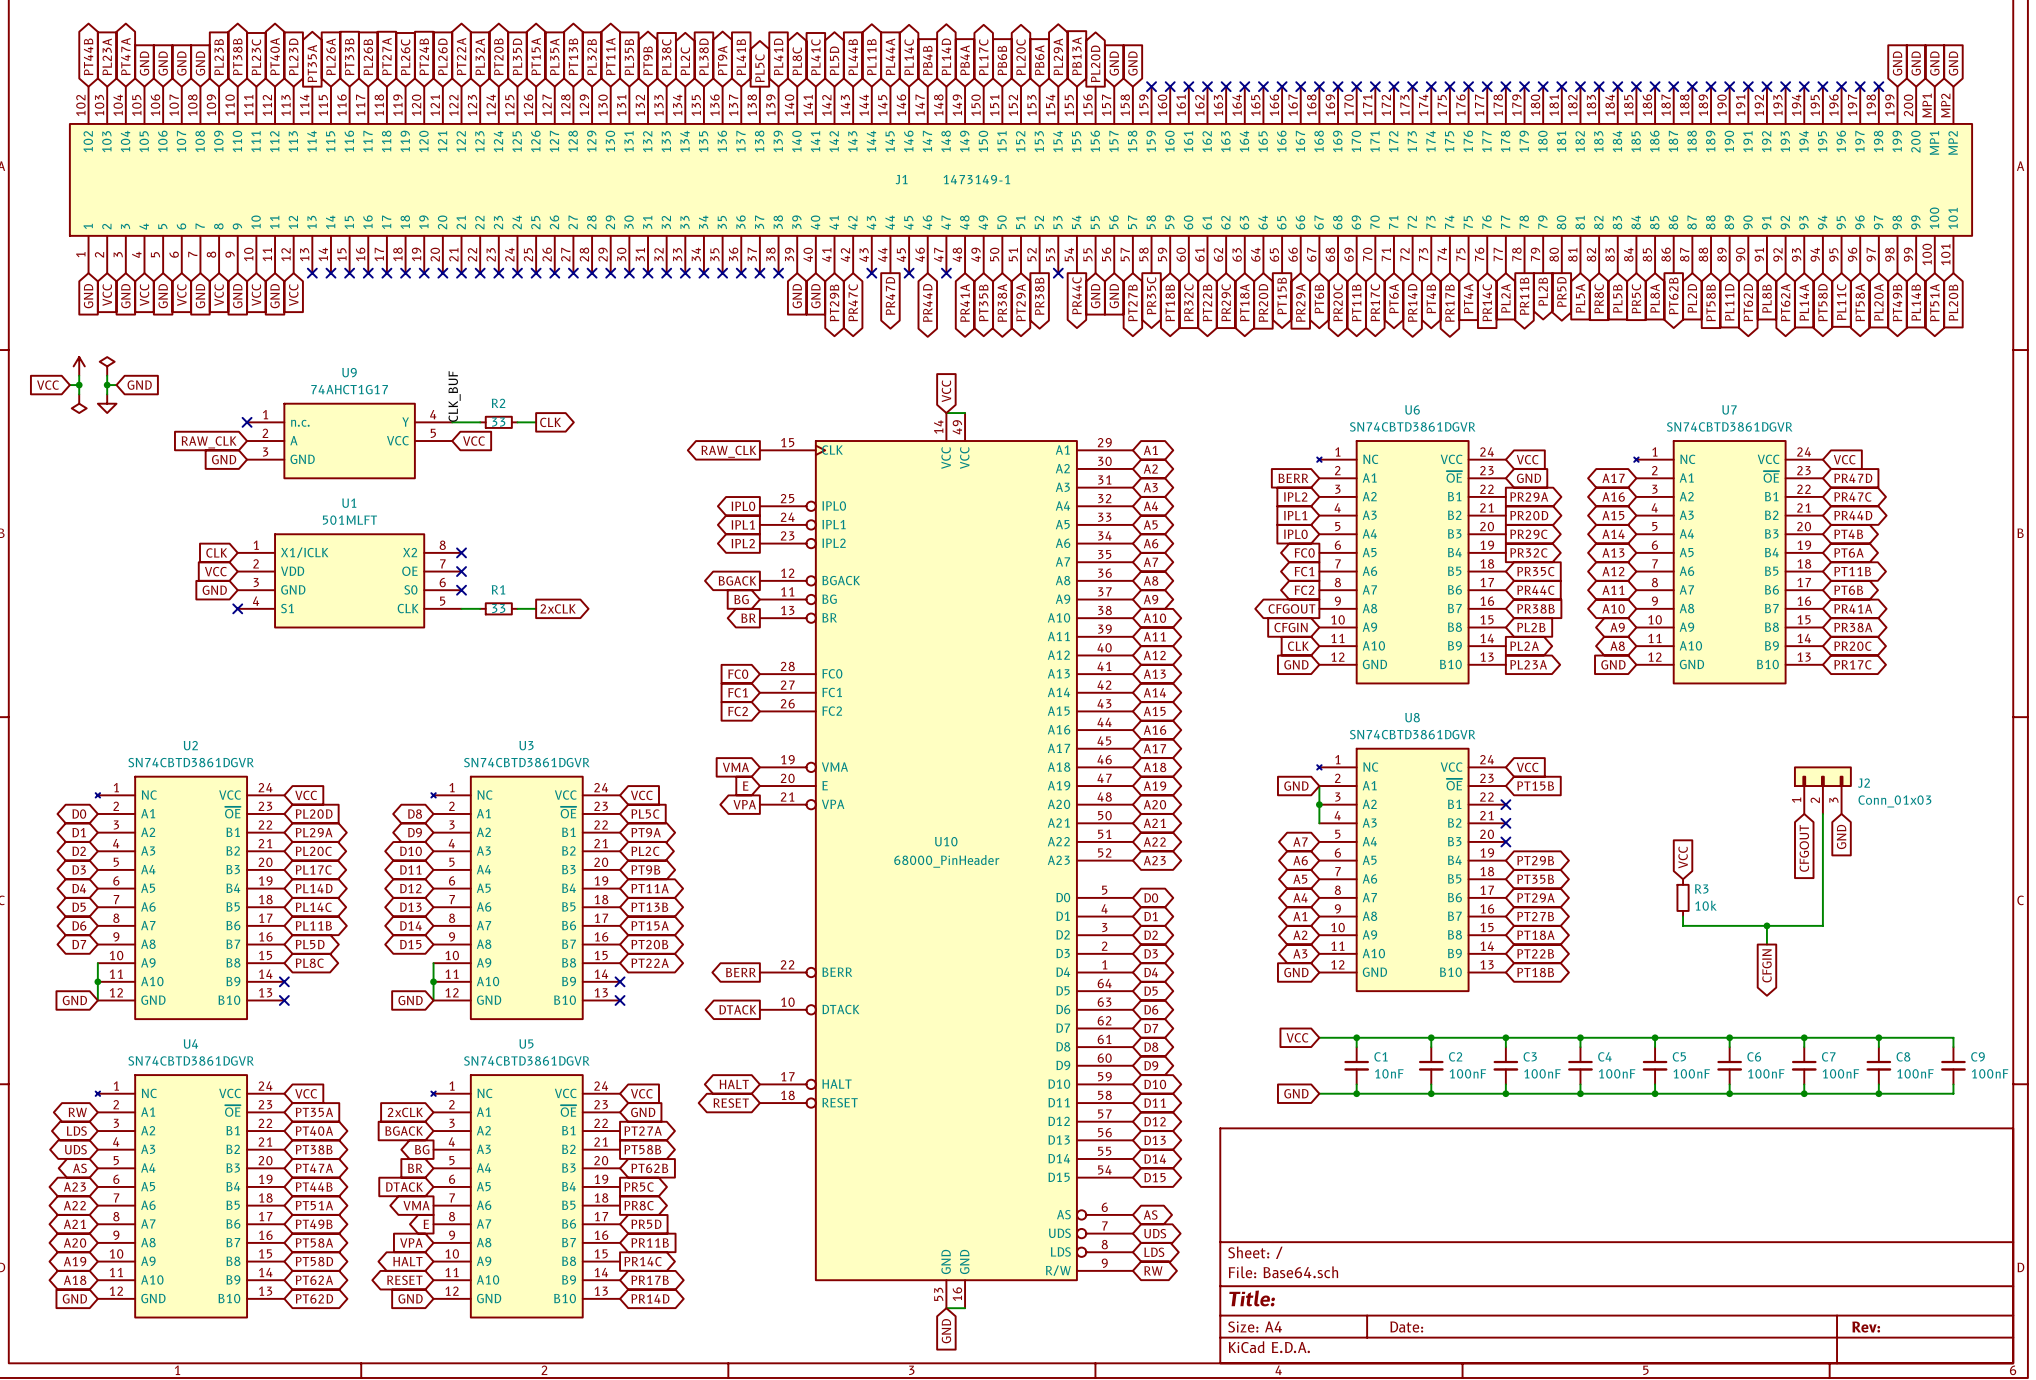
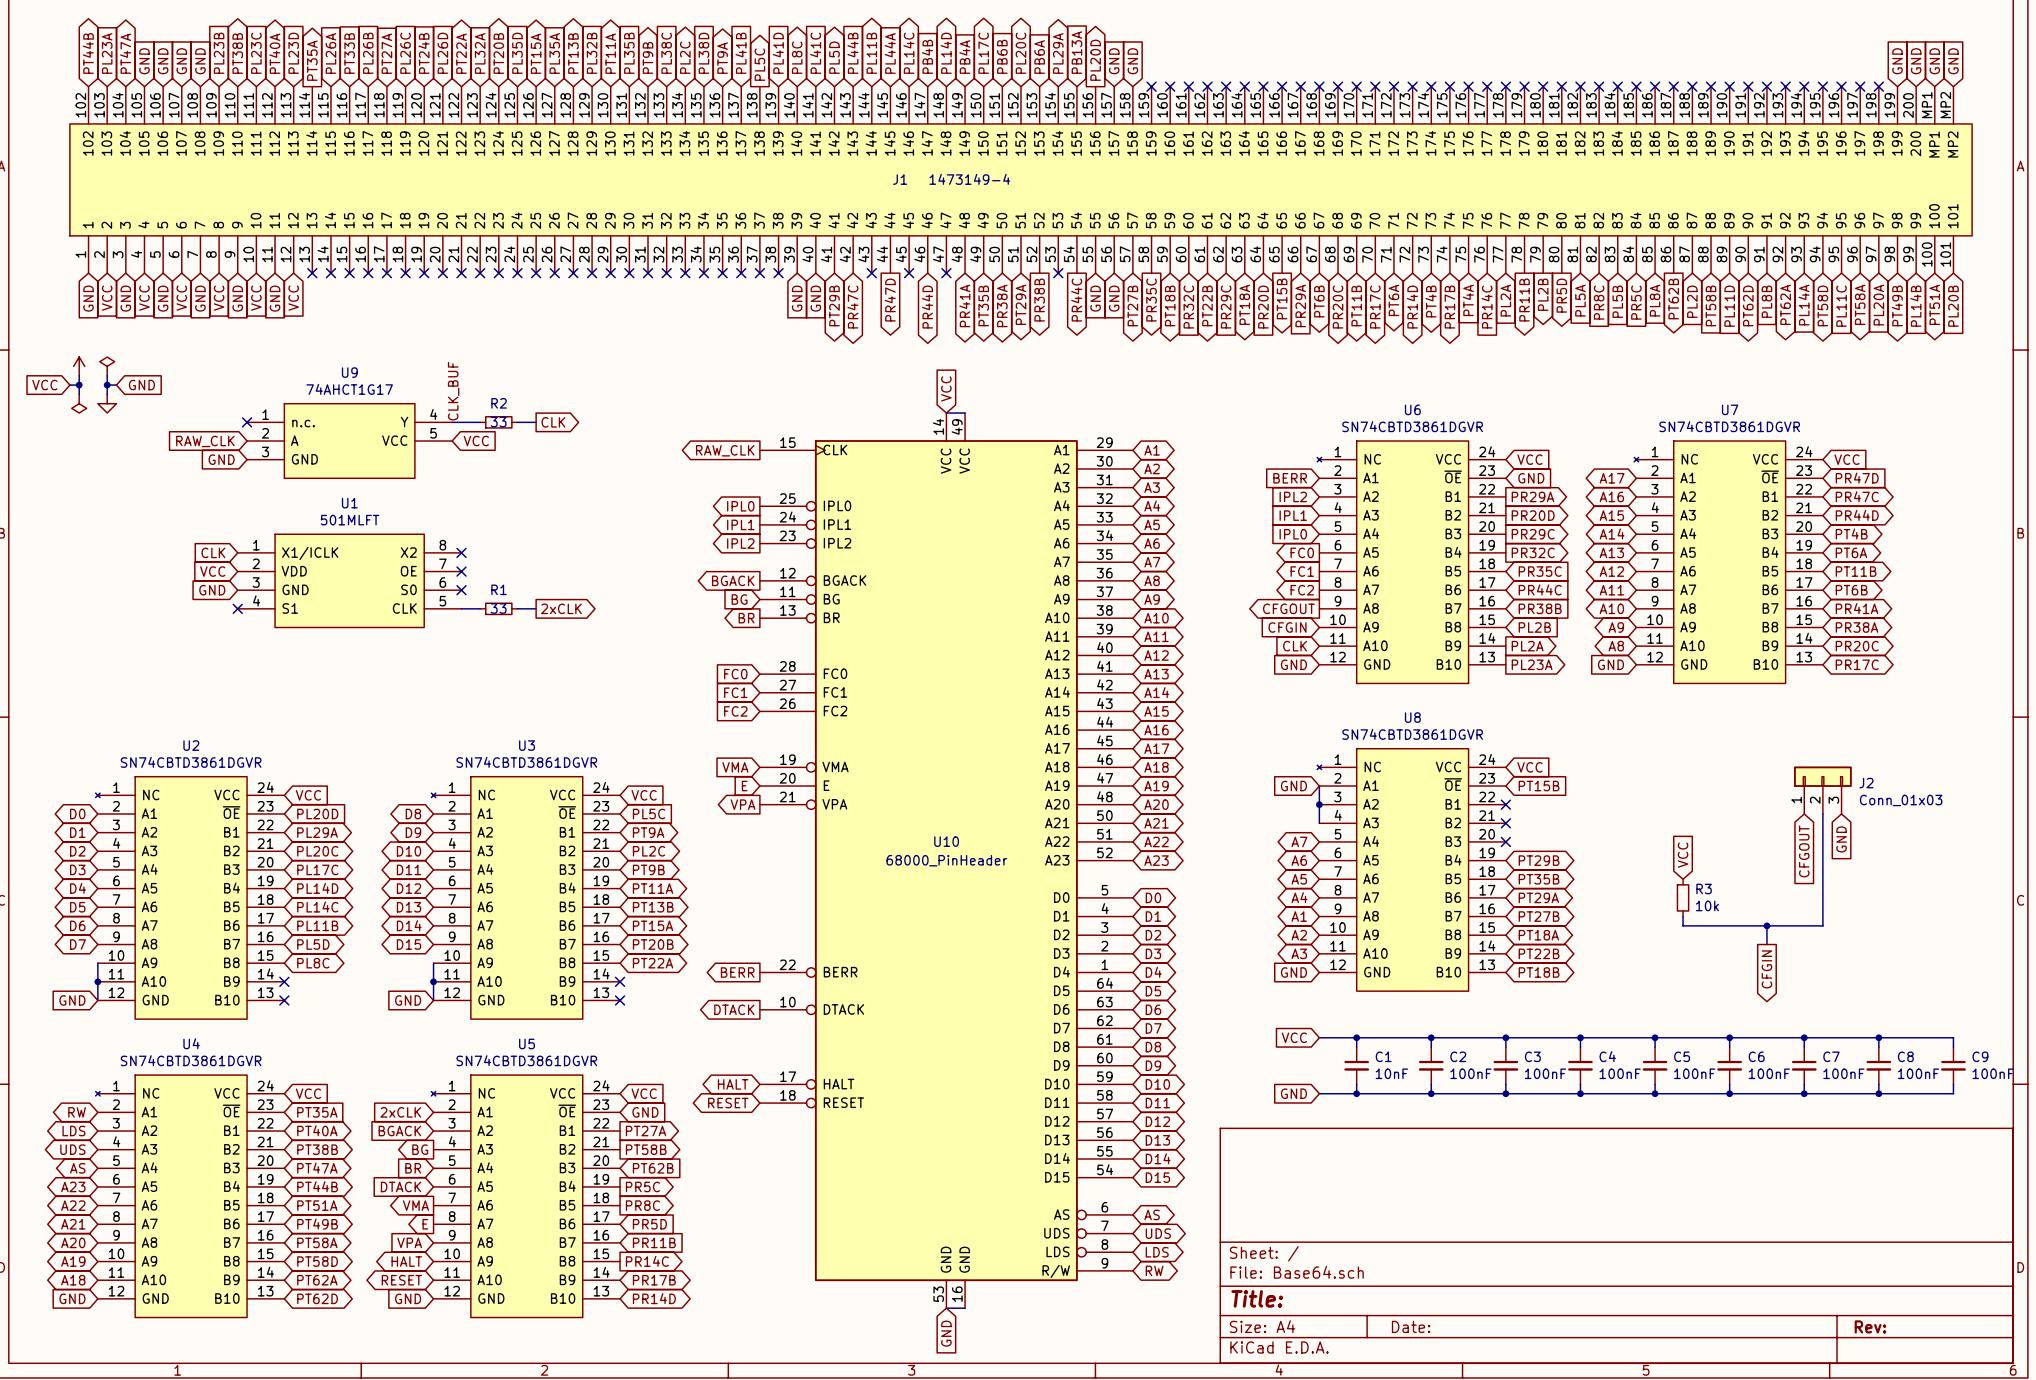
J1 value: 1473149-1 (976, 179) -> 1473149-4 (969, 179)

